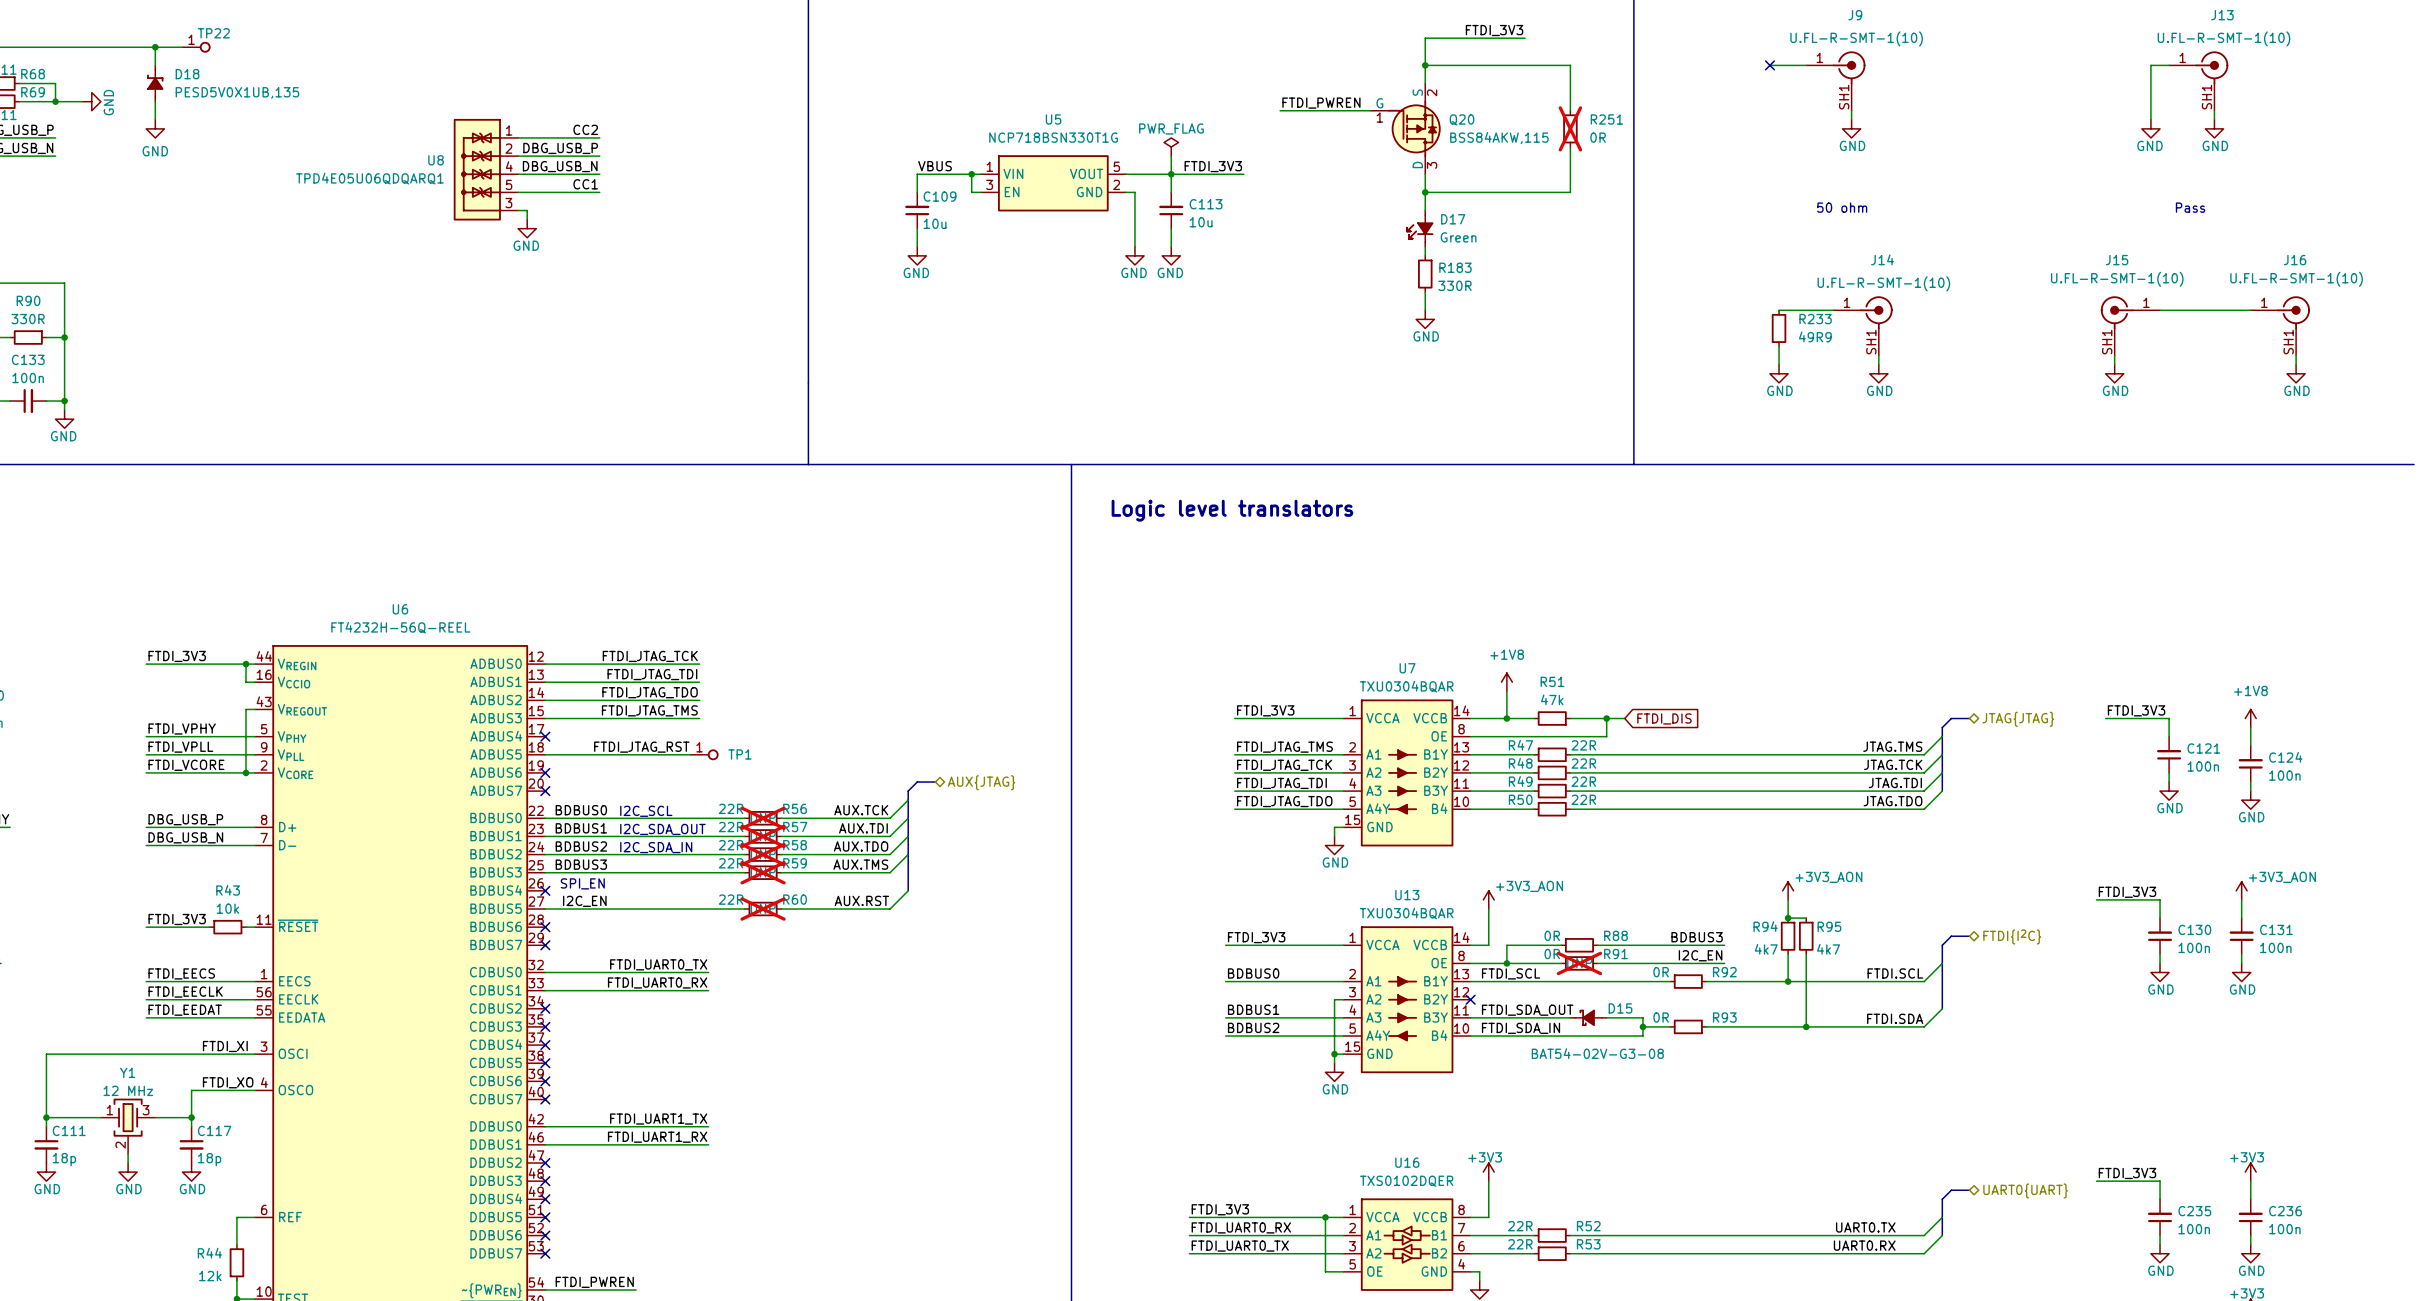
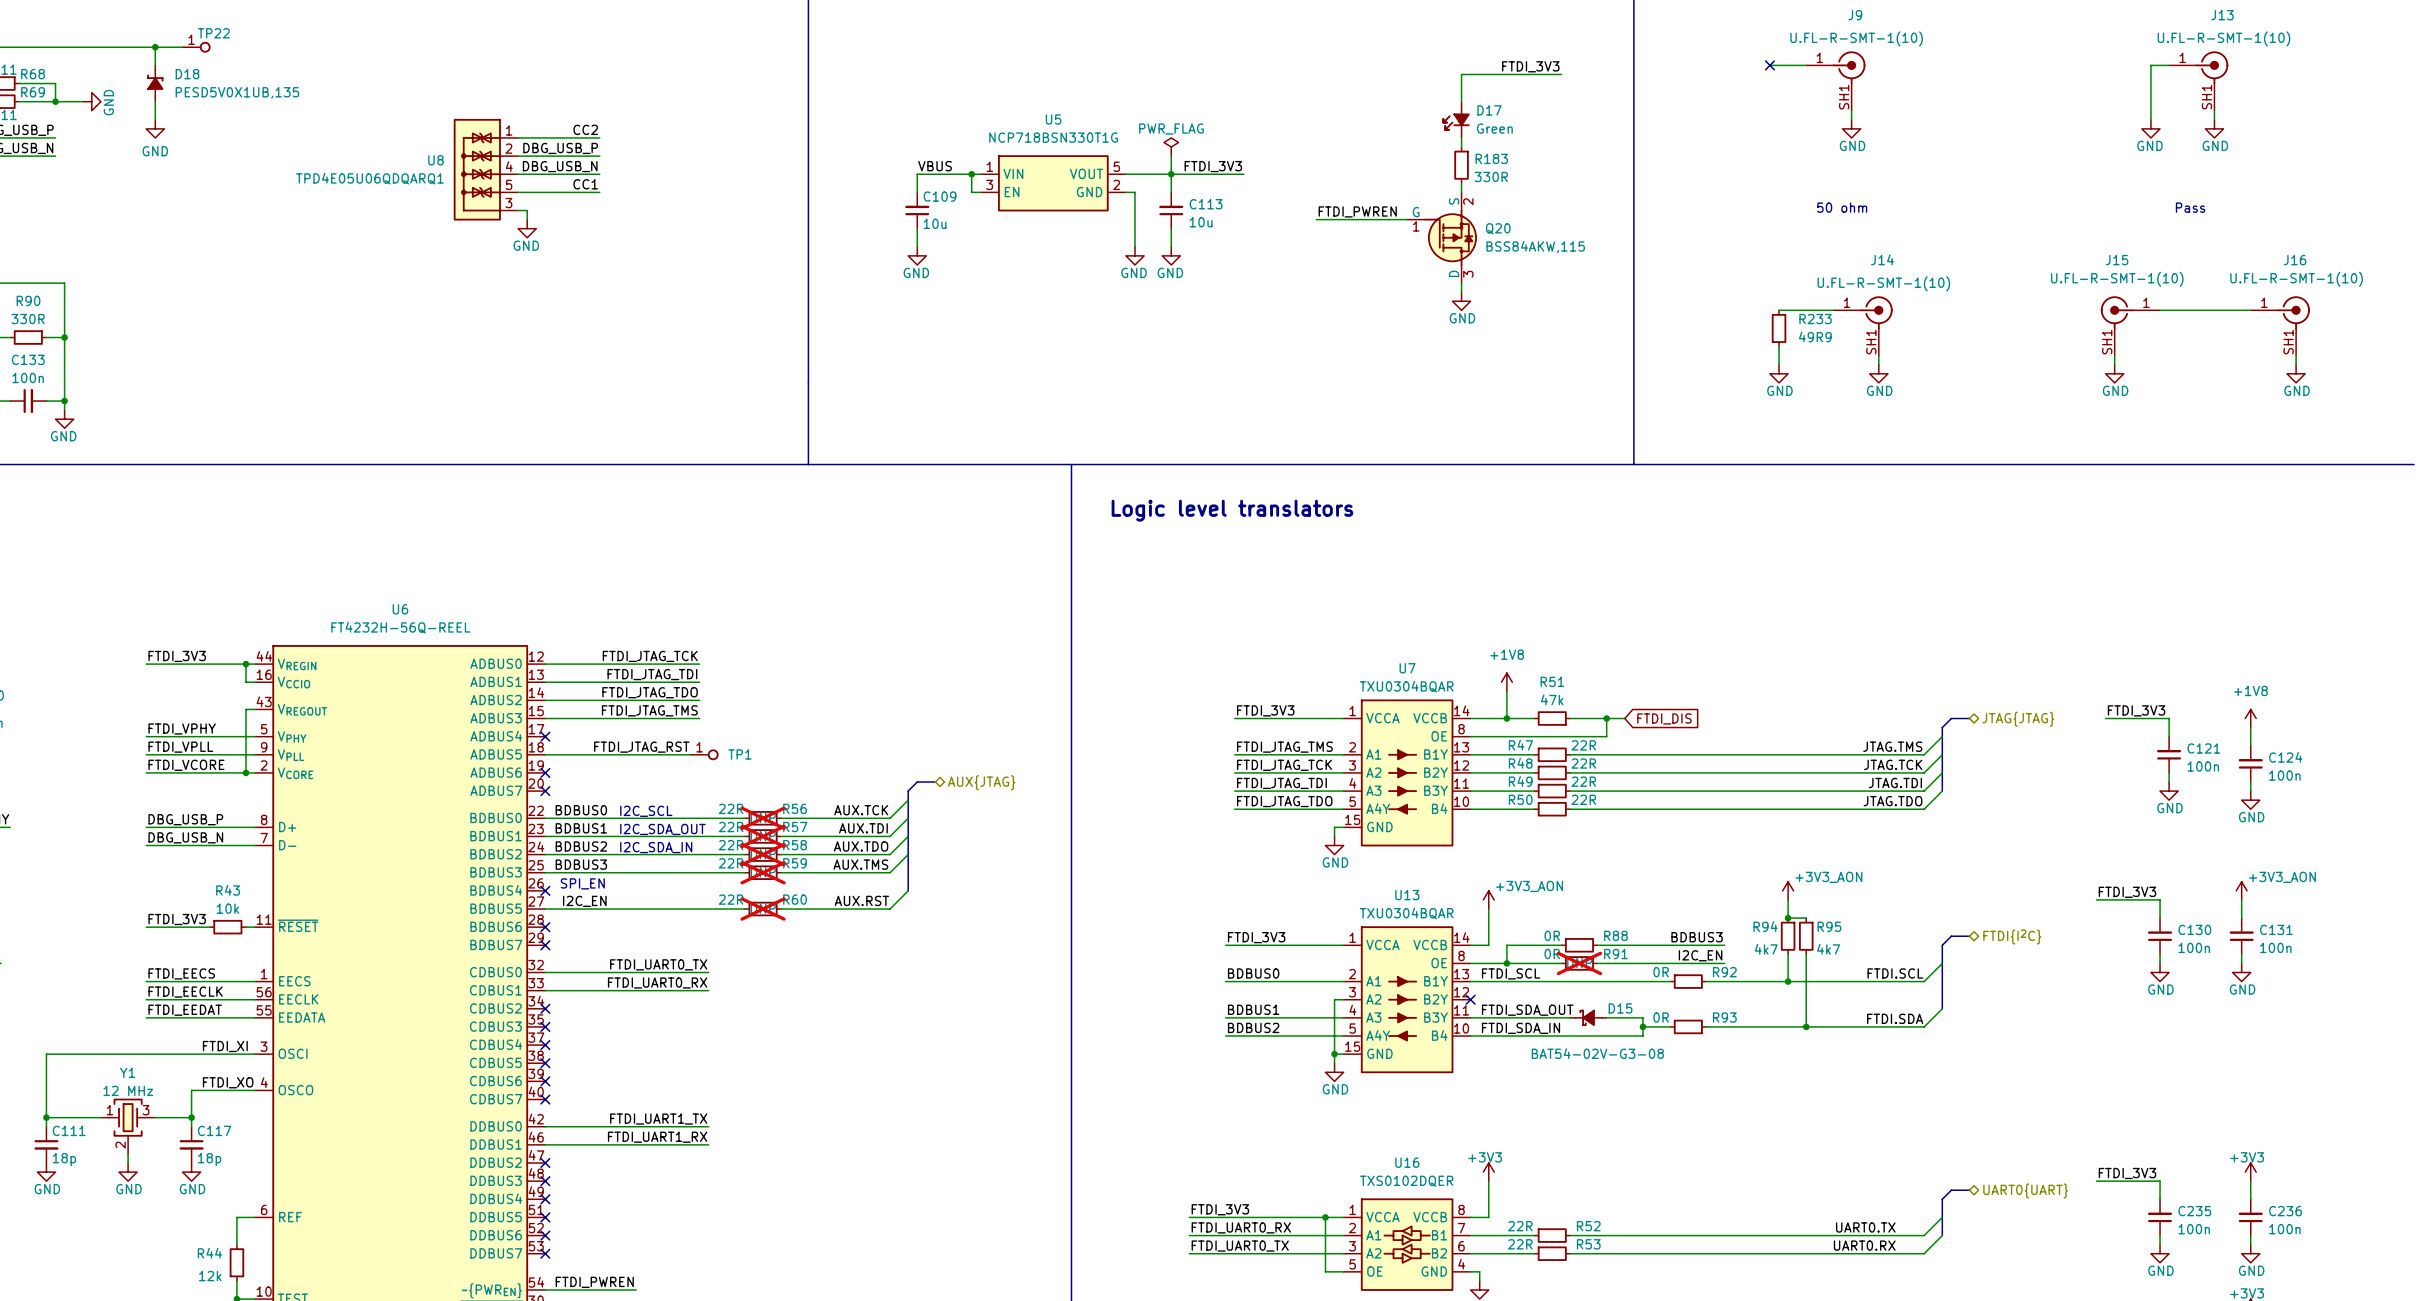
label position: FTDI_3V3 (1494, 30) -> FTDI_3V3 (1530, 66)
wire: (1525, 38) (1425, 38) (1425, 83) -> none
wire: (1425, 65) (1570, 65) (1570, 110) -> none
junction: (1425, 65) -> none
wire: none -> (1561, 74) (1461, 74) (1461, 101)
label position: FTDI_PWREN (1321, 103) -> FTDI_PWREN (1357, 211)
wire: (1280, 110) (1370, 110) -> (1316, 219) (1407, 219)
Q20 position: (1405, 128) -> (1442, 237)
R251: (1570, 128) -> none
wire: none -> (1461, 137) (1461, 147)
wire: (1570, 147) (1570, 192) (1425, 192) -> none
wire: (1425, 174) (1425, 210) -> none
wire: none -> (1461, 183) (1461, 192)
junction: (1425, 192) -> none
D17 position: (1419, 228) -> (1456, 119)
wire: (1425, 246) (1425, 255) -> (1461, 283) (1461, 292)
R183 position: (1425, 274) -> (1461, 165)
wire: (1425, 292) (1425, 310) -> none
power symbol position: GND (1425, 319) -> GND (1461, 301)

